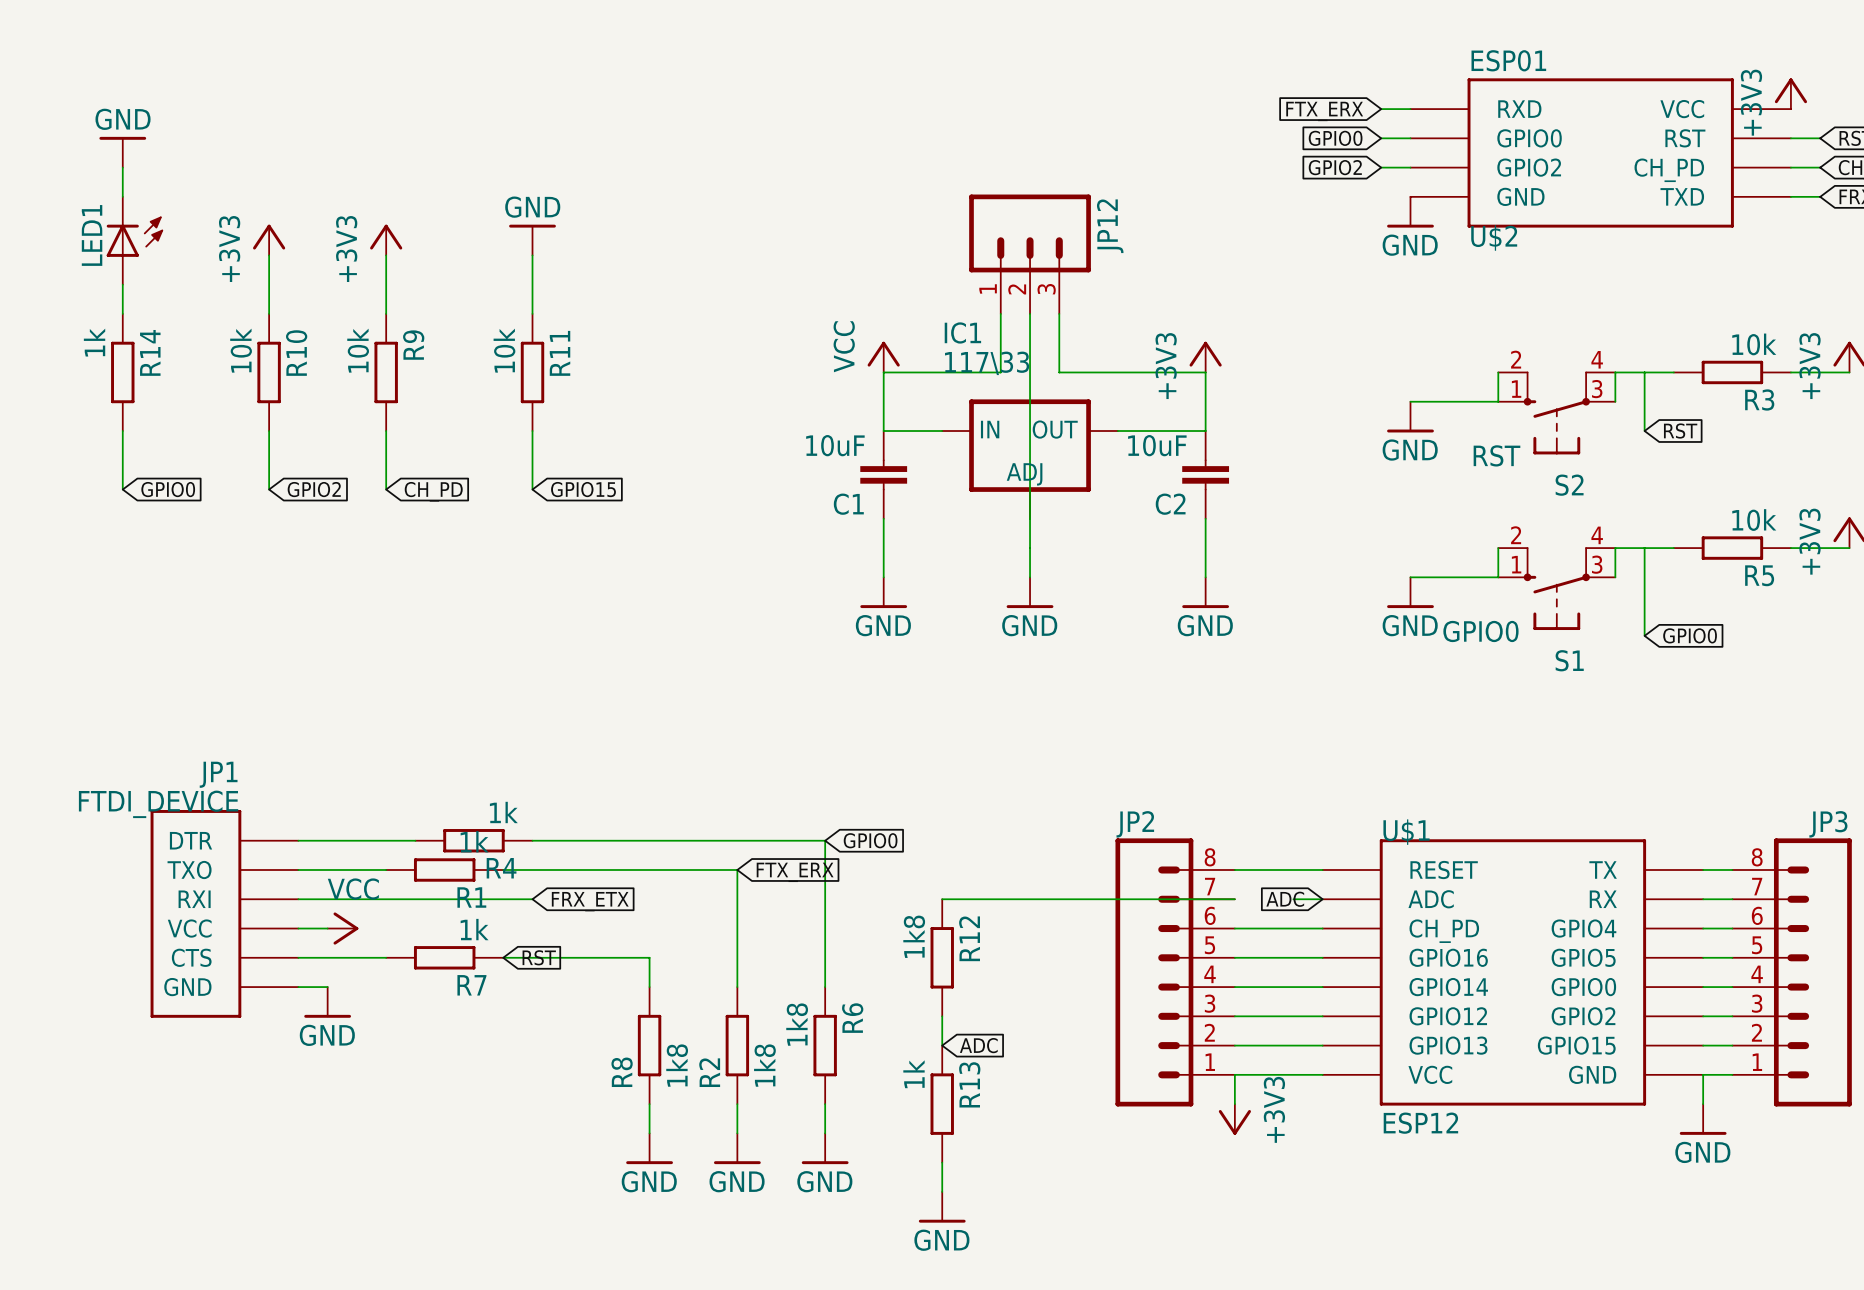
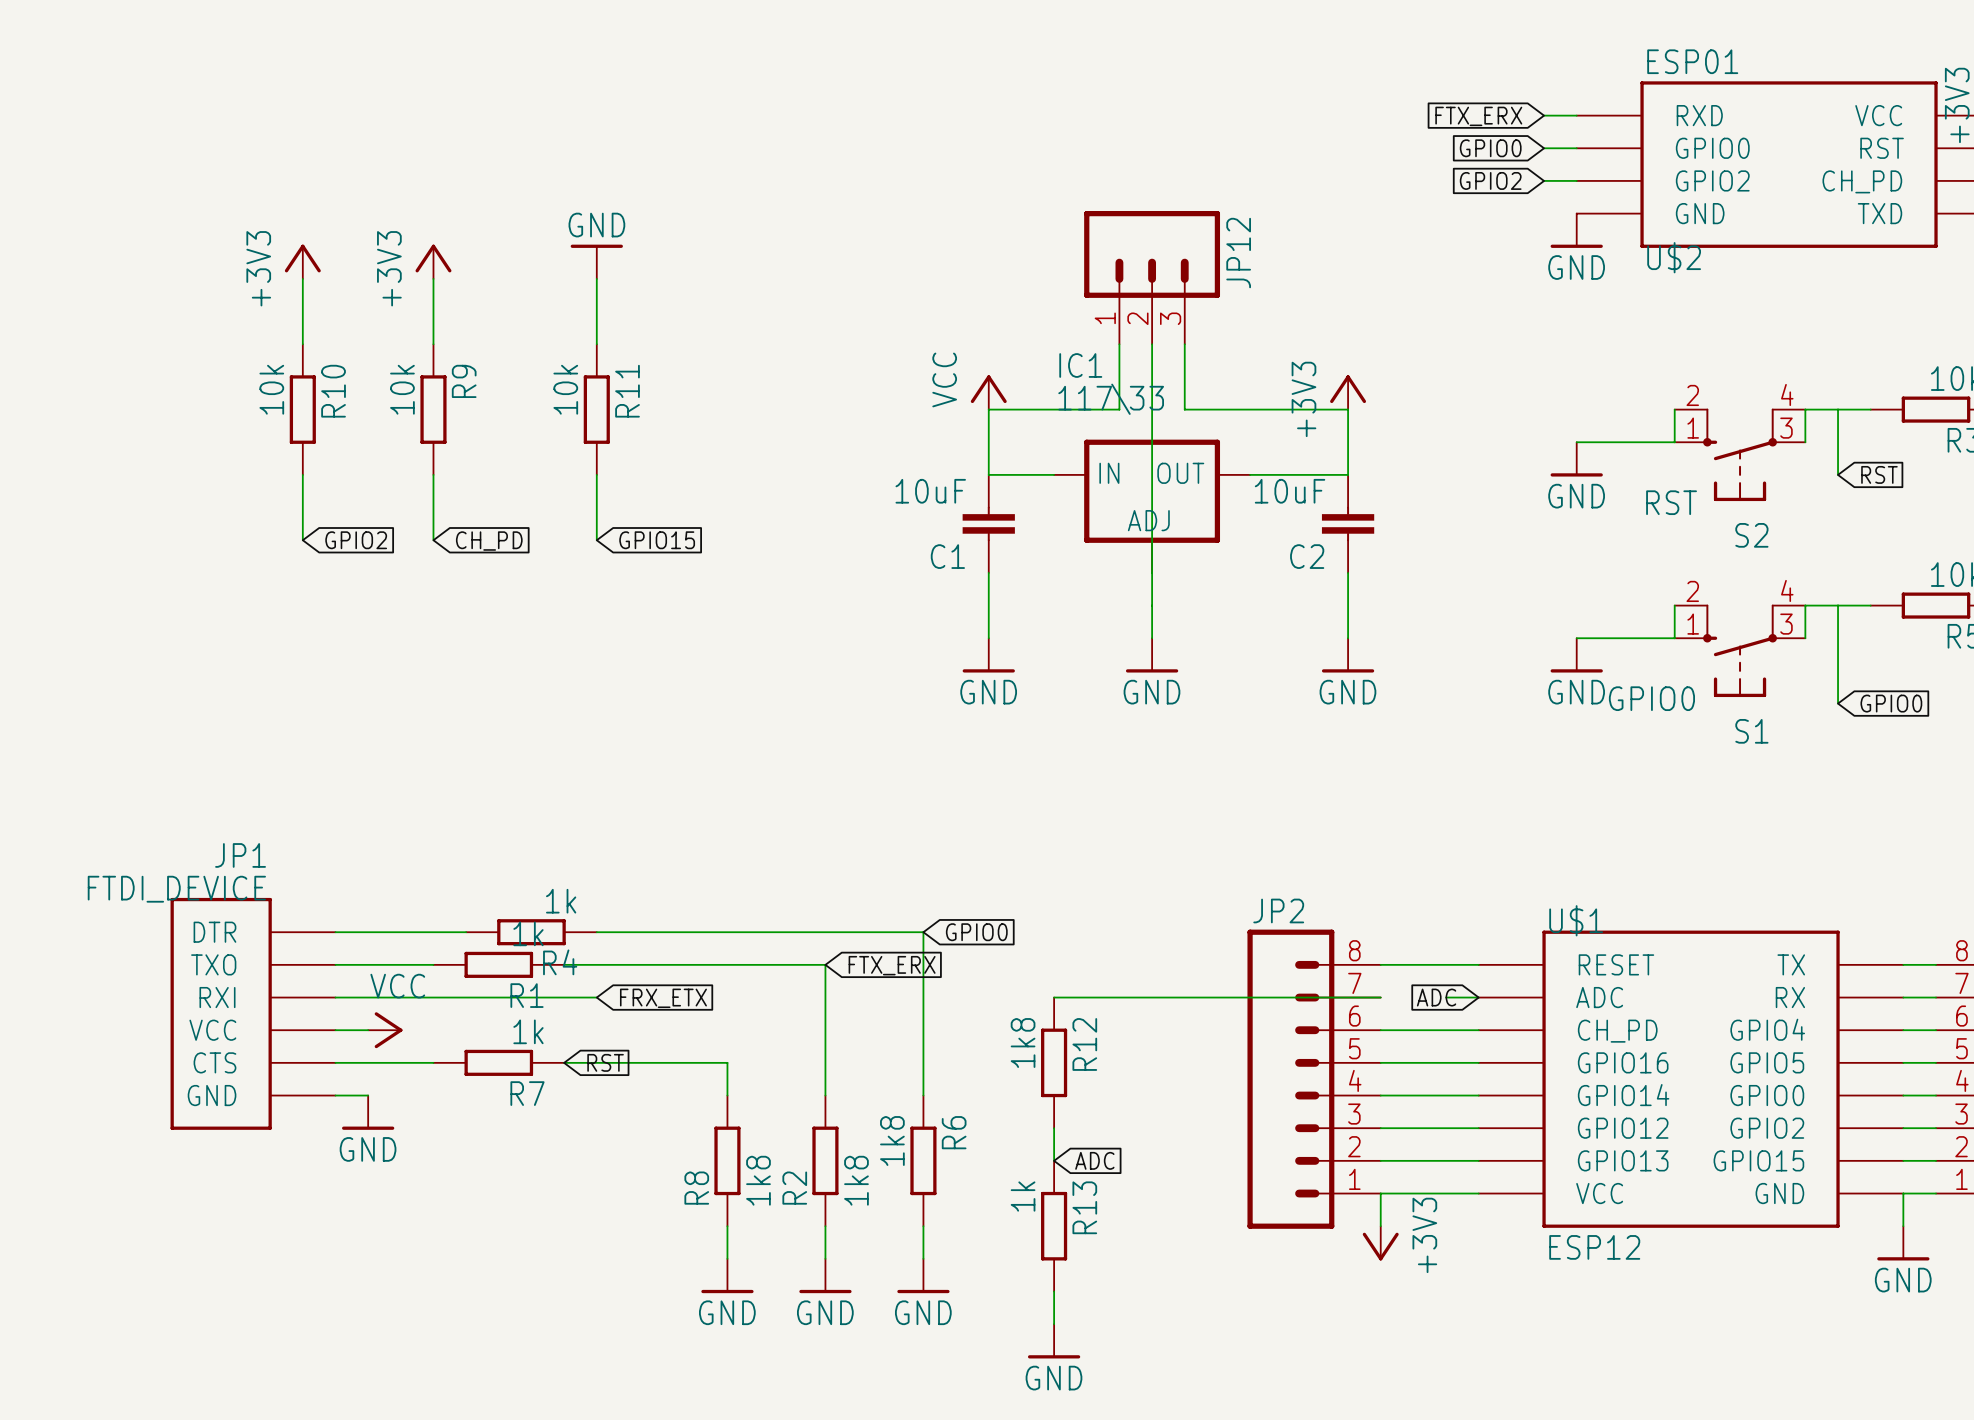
power symbol: GND (122, 152) -> none
wire: (122, 167) (122, 196) -> none
LED1: (134, 240) -> none
wire: (122, 284) (122, 313) -> none
R14: 1k (122, 372) -> none
wire: (122, 431) (122, 489) -> none
global label: GPIO0 (168, 489) -> none

